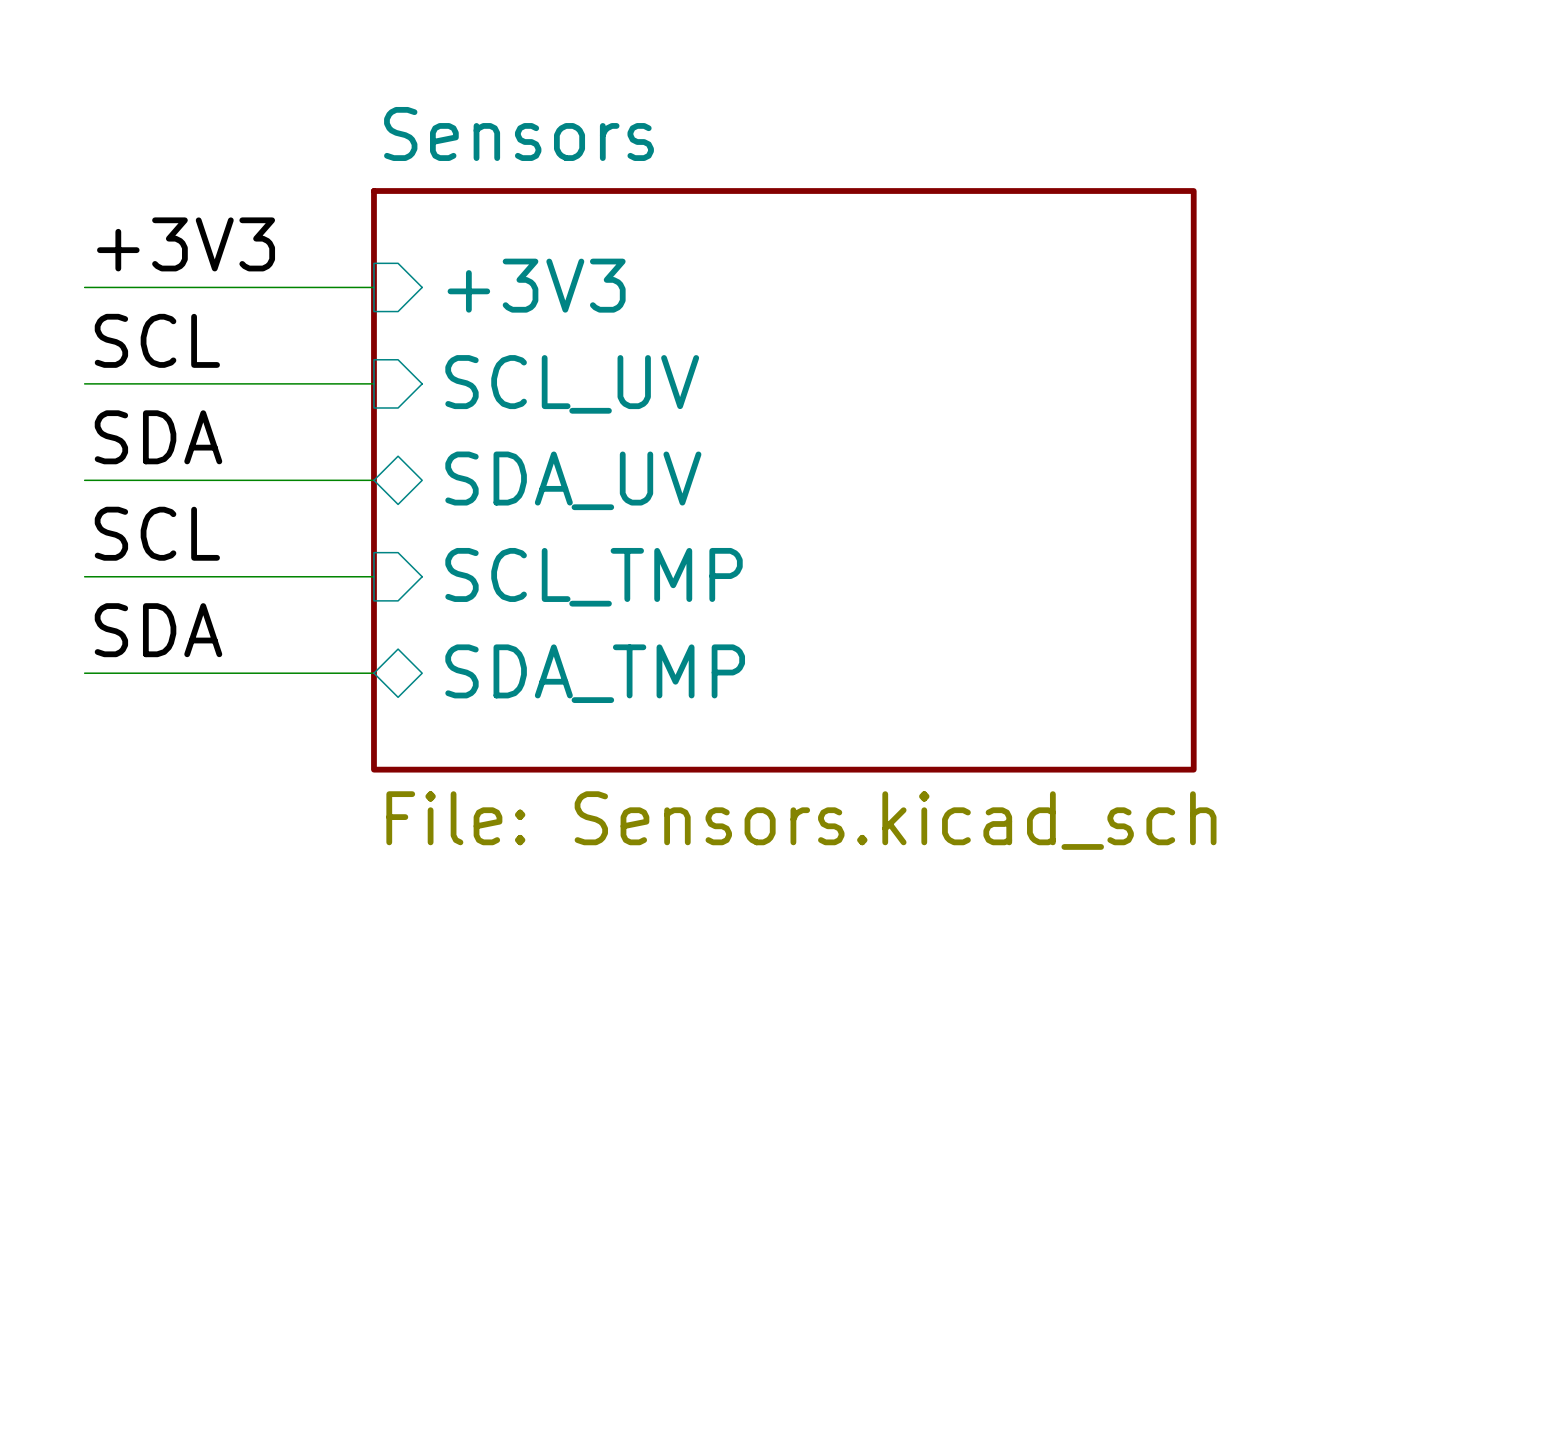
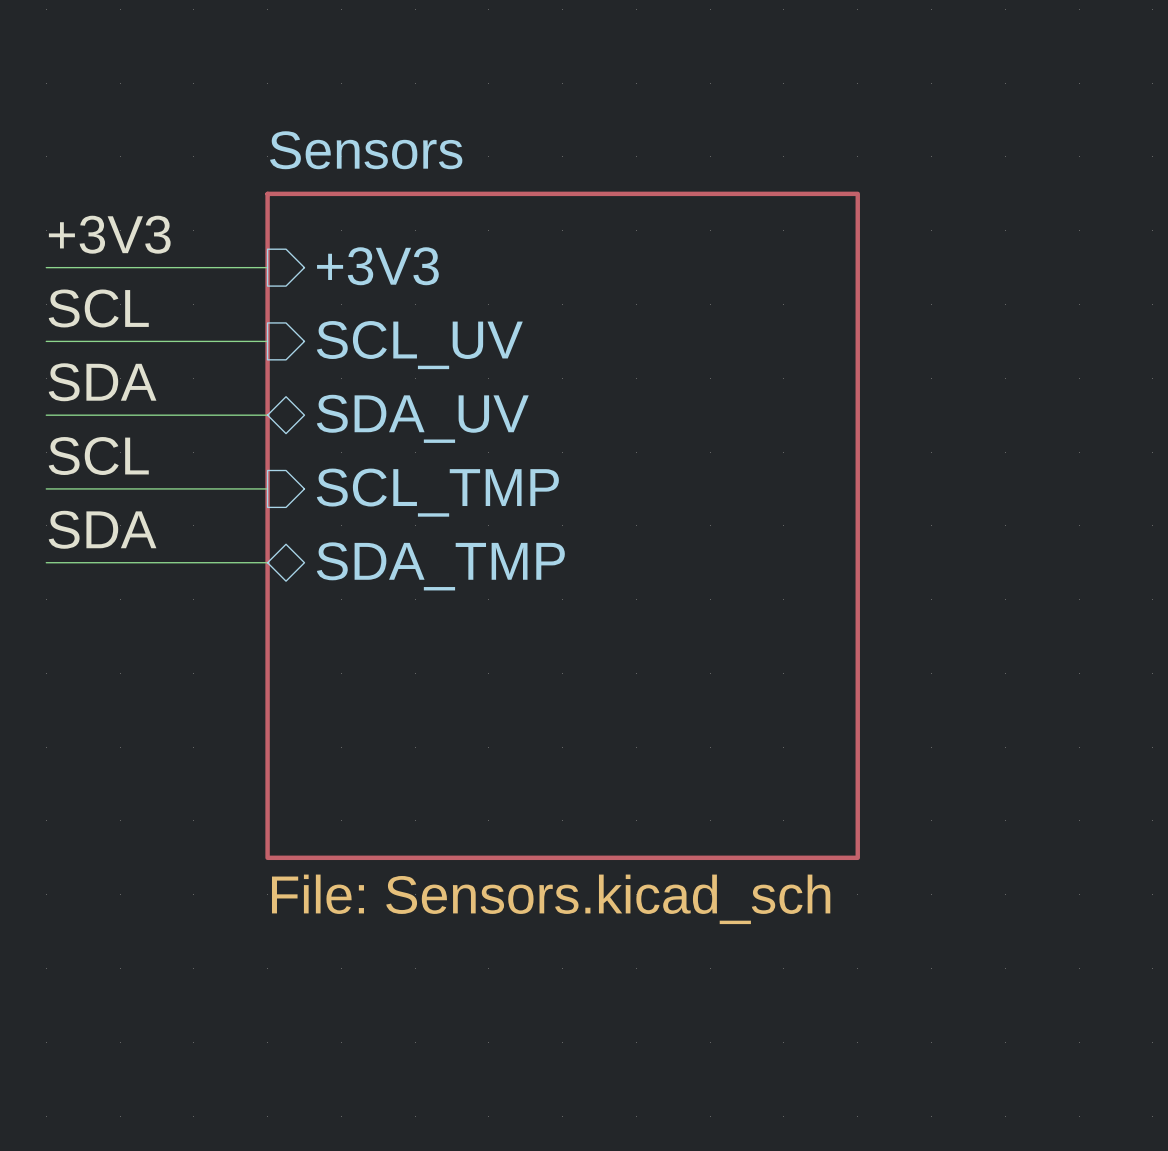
sheet Sensors: File: Sensors.kicad_sch (783, 480) -> none
sheet Sensors: none -> File: Sensors.kicad_sch (562, 525)

